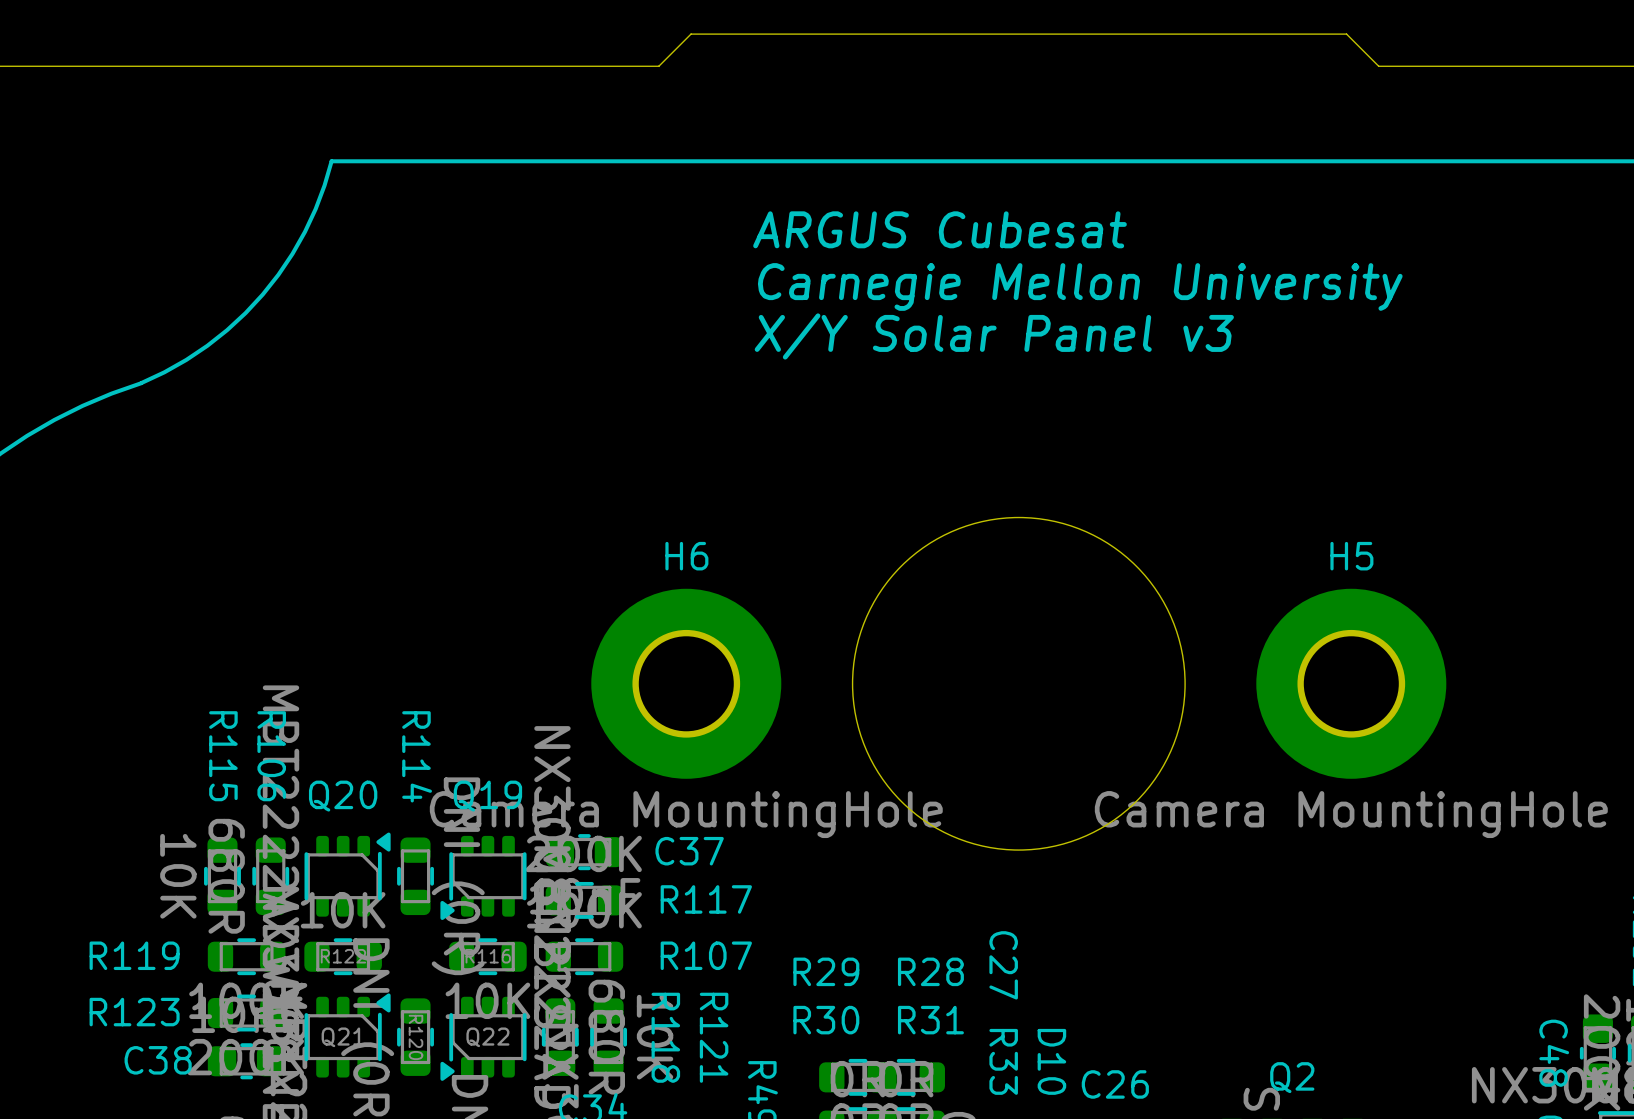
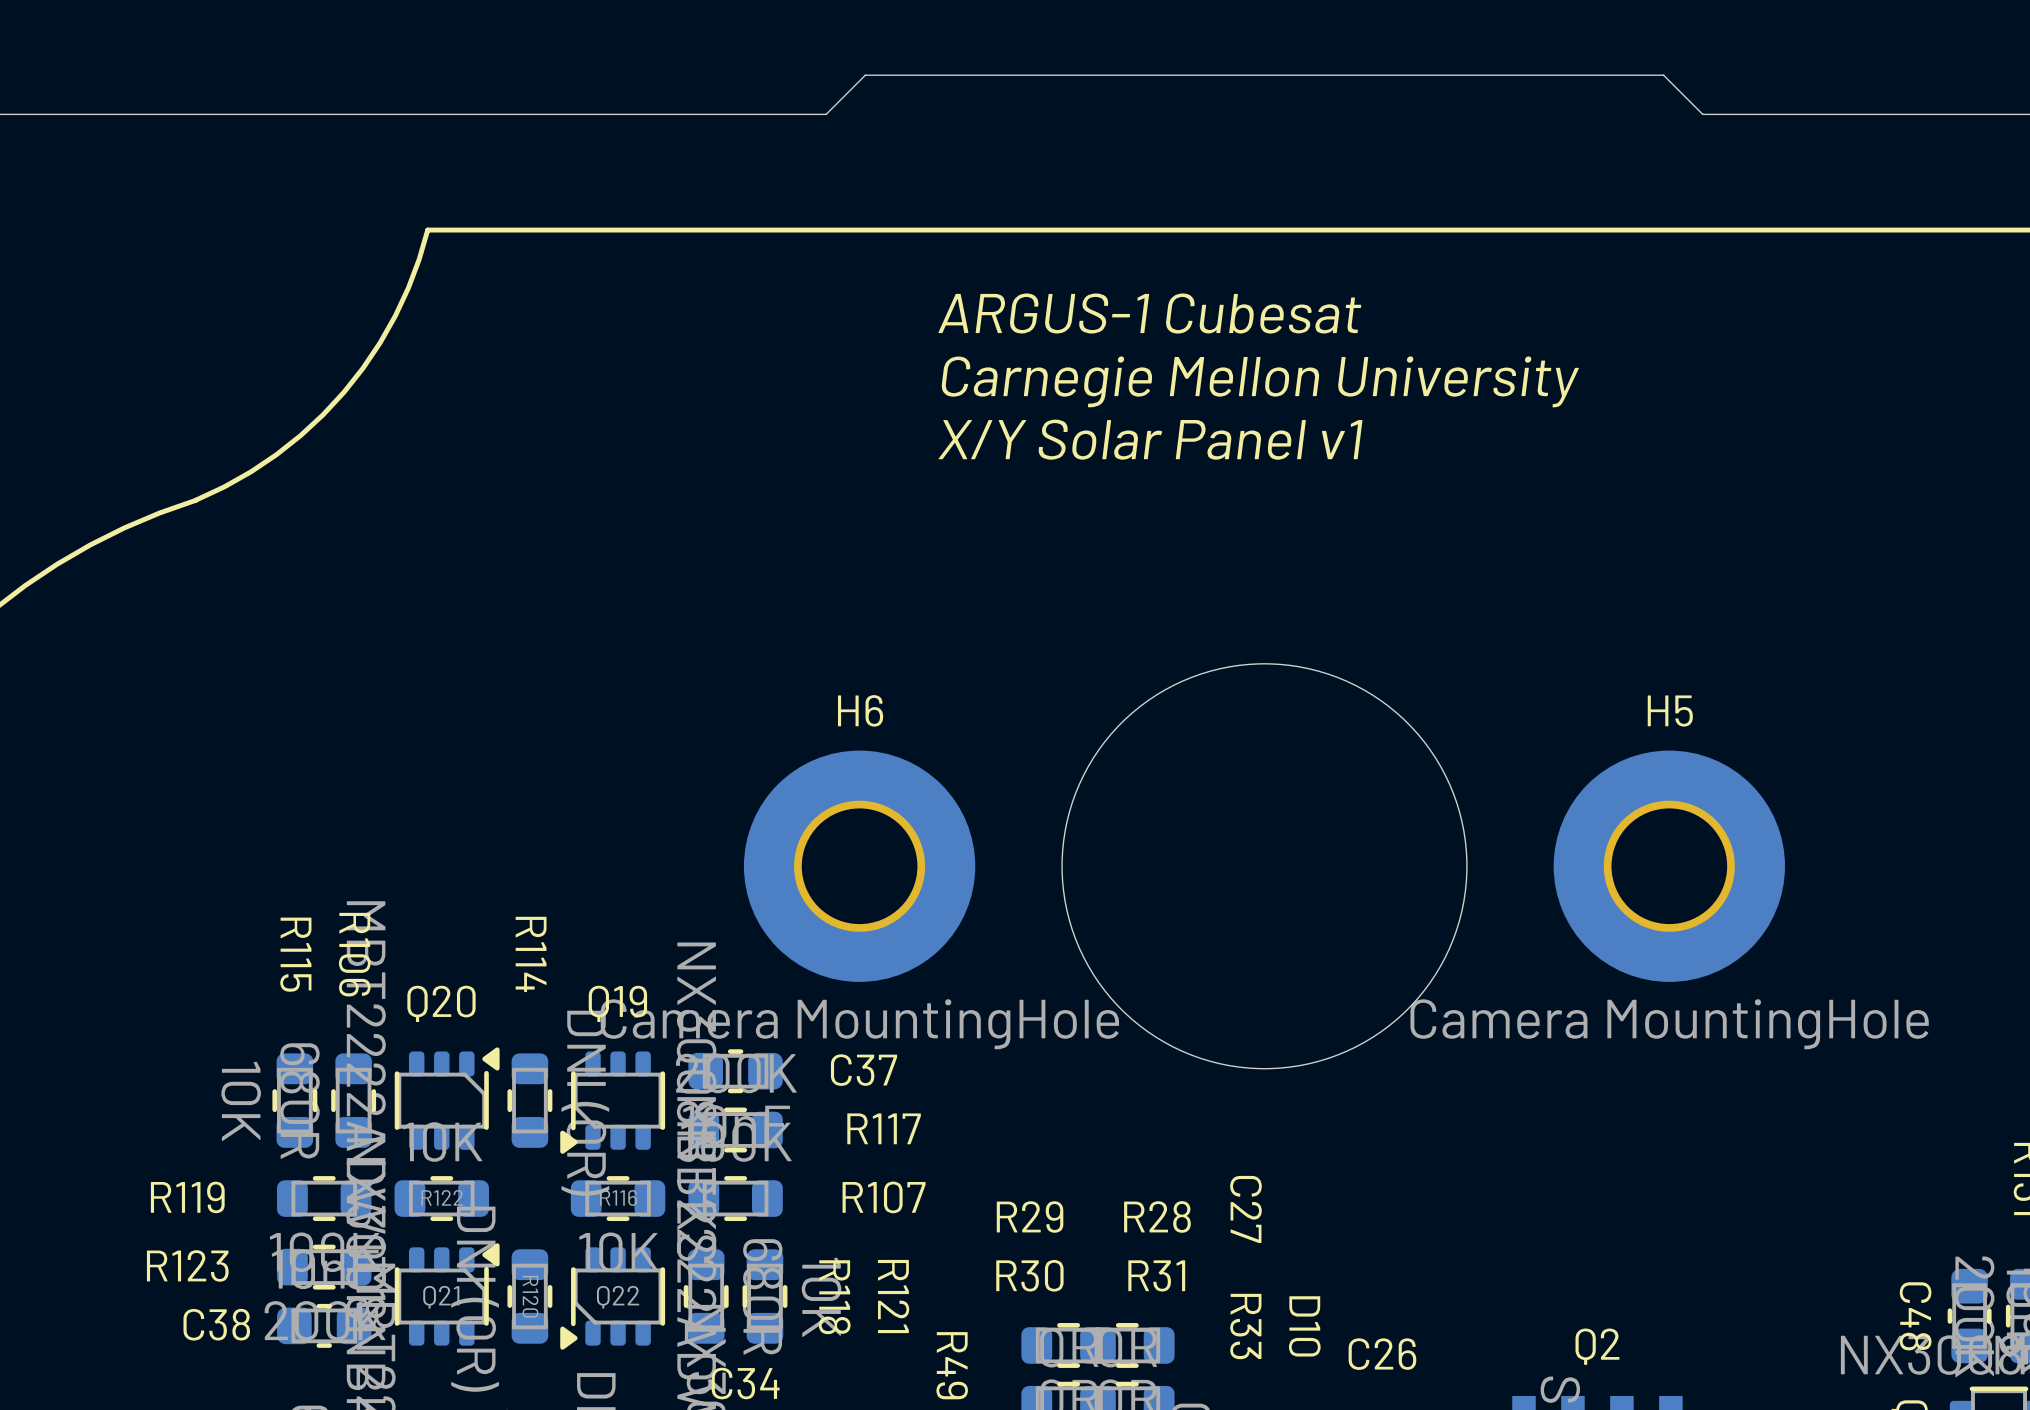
text: ARGUS Cubesat (940, 229) -> ARGUS-1 Cubesat (1149, 313)
text: X/Y Solar Panel v3 (994, 336) -> X/Y Solar Panel v1 (1150, 439)

